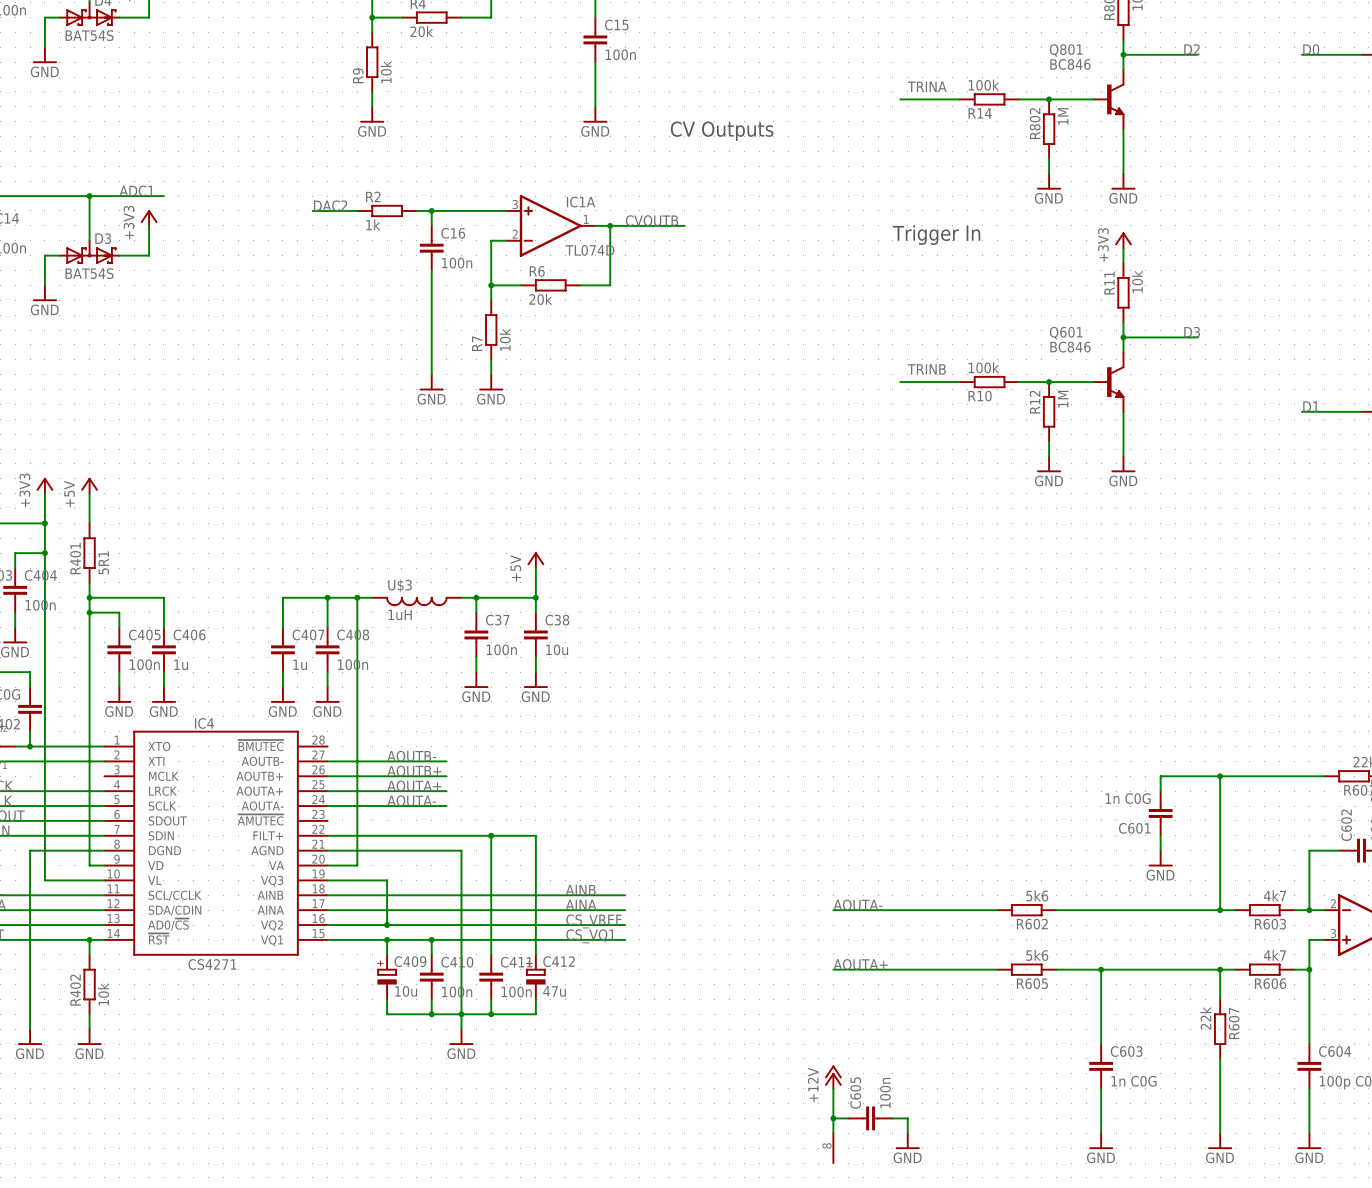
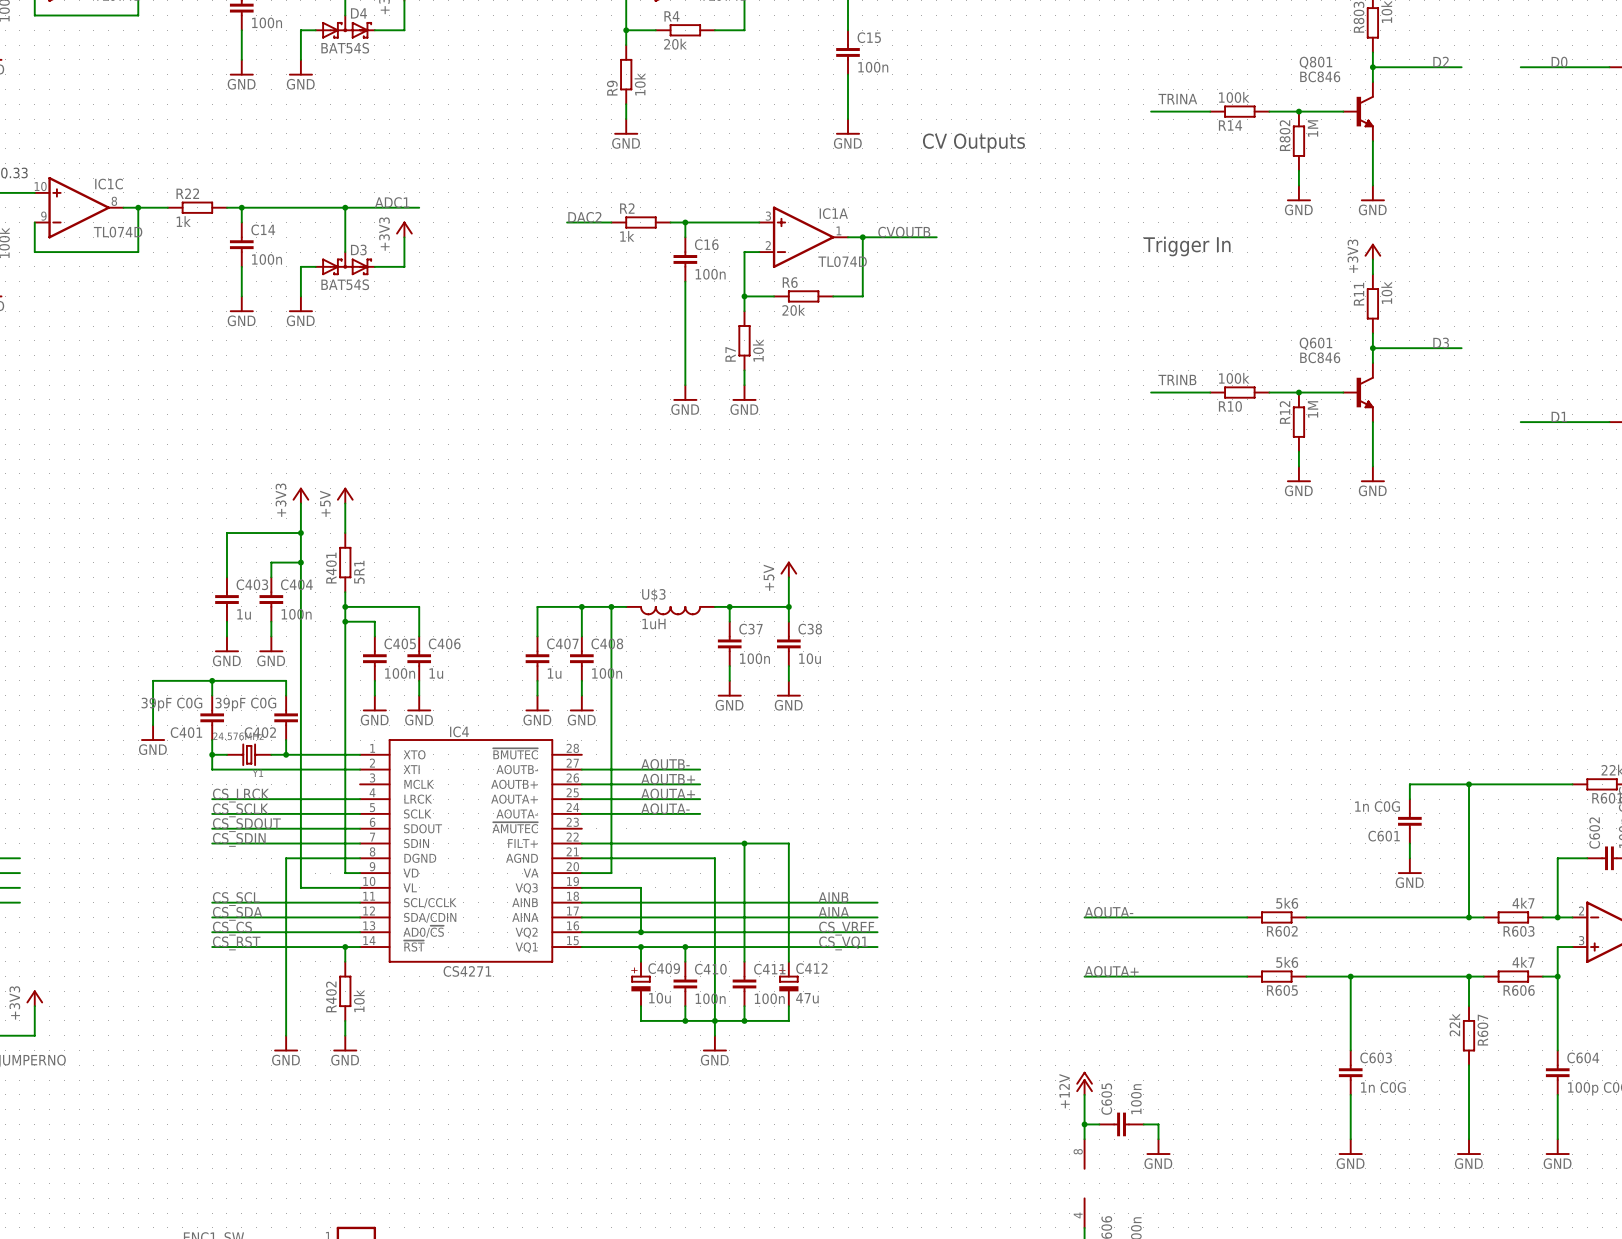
wire: none -> (1446, 67) (1461, 67)
wire: none -> (1520, 67) (1550, 67)
wire: none -> (1446, 348) (1461, 348)
wire: none -> (1520, 422) (1550, 422)

